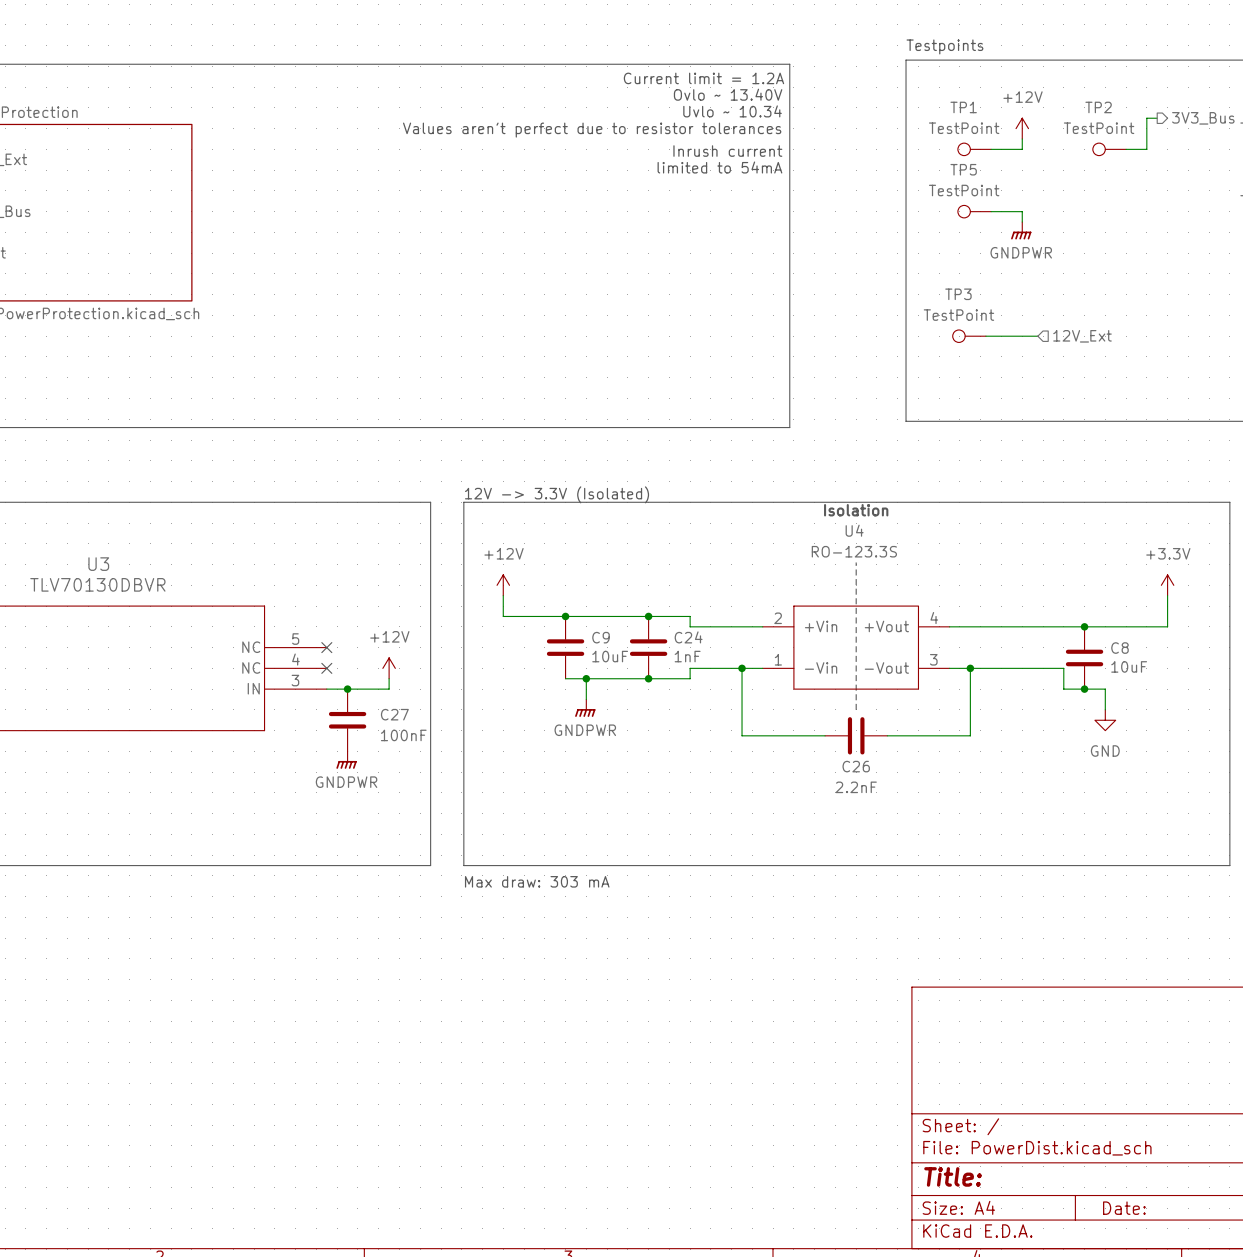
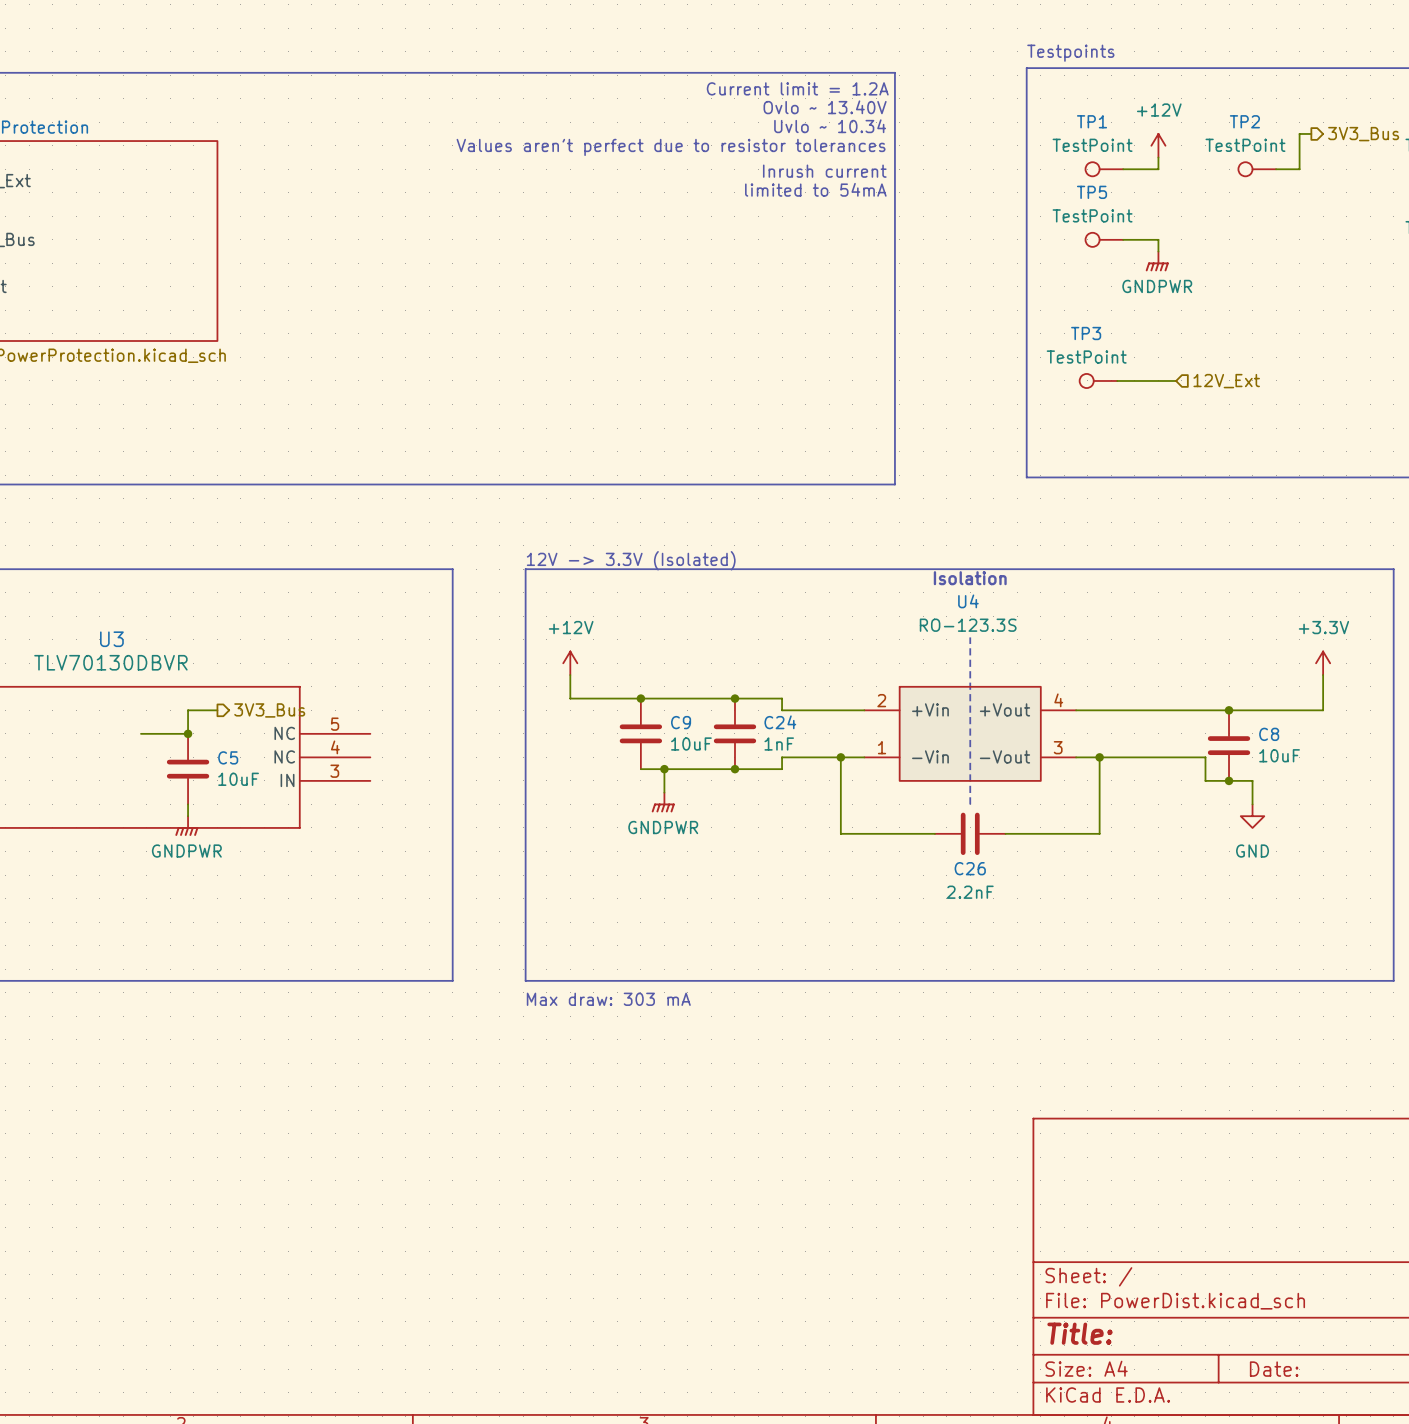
line: (399, 502) (430, 502) (430, 865) (399, 865) -> (452, 569) (452, 980)
wire: none -> (217, 710) (188, 710) (188, 733) (140, 733)
hierarchical label: none -> 3V3_Bus (269, 710)
junction: none -> (188, 733)
no-connect mark: (326, 647) -> none
no-connect mark: (326, 668) -> none
power symbol: +12V (389, 668) -> none
C5: none -> 10uF (188, 769)
wire: (389, 678) (389, 689) (326, 689) -> none
junction: (347, 689) -> none
wire: none -> (188, 804) (188, 816)
C27: 100nF (347, 720) -> none
power symbol: none -> GNDPWR (186, 826)
power symbol: GNDPWR (346, 760) -> none

